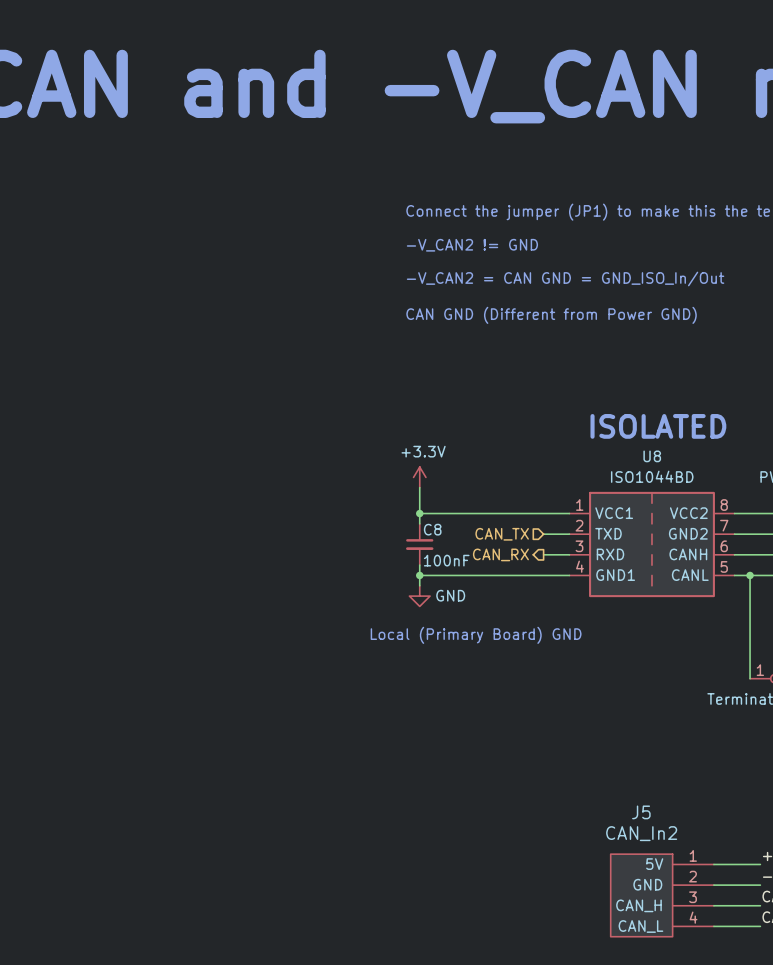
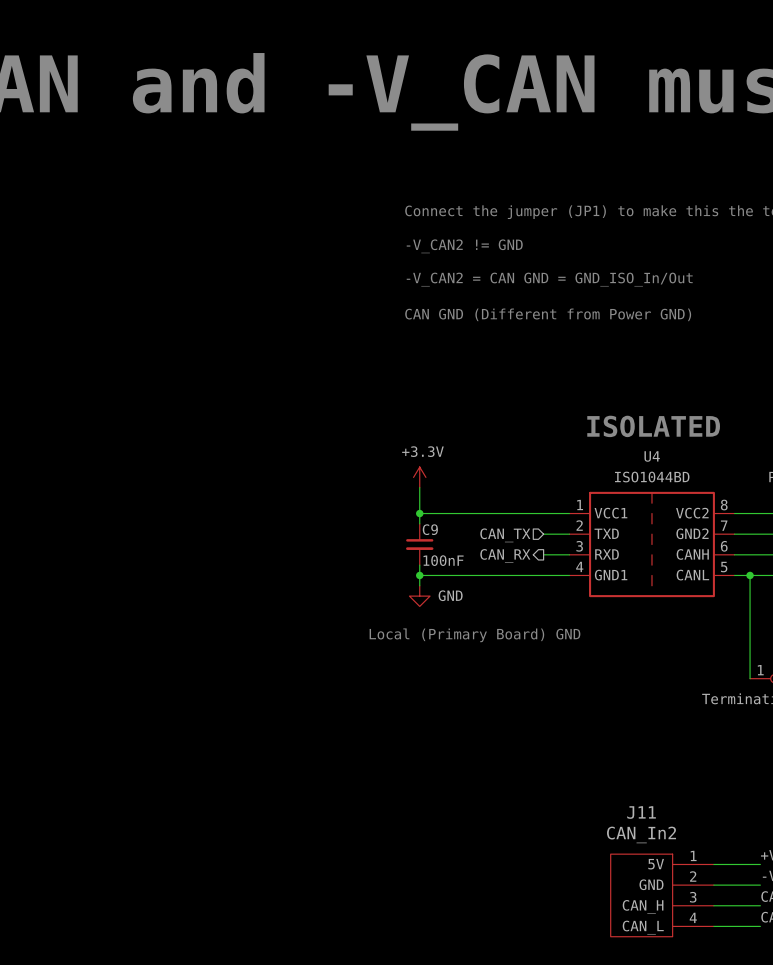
U8 name: U8 (652, 456) -> U4 (652, 456)
C8 name: C8 (432, 529) -> C9 (430, 529)
J5 name: J5 (641, 812) -> J11 (641, 812)

